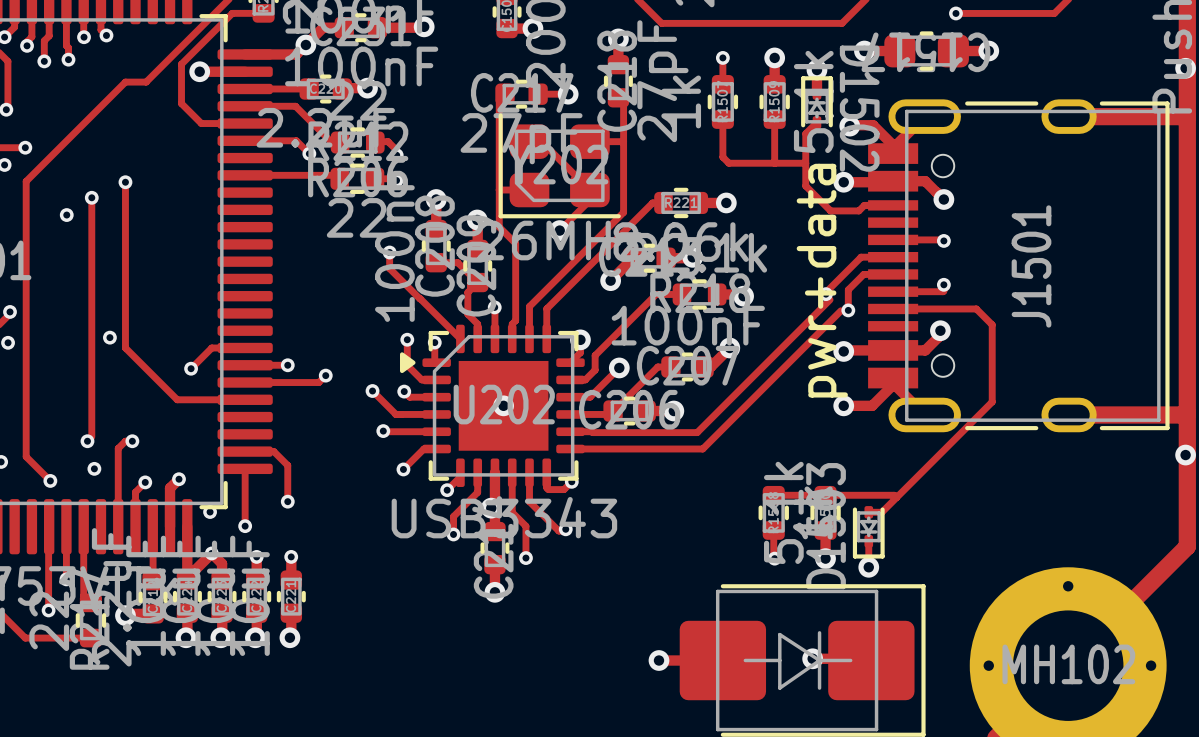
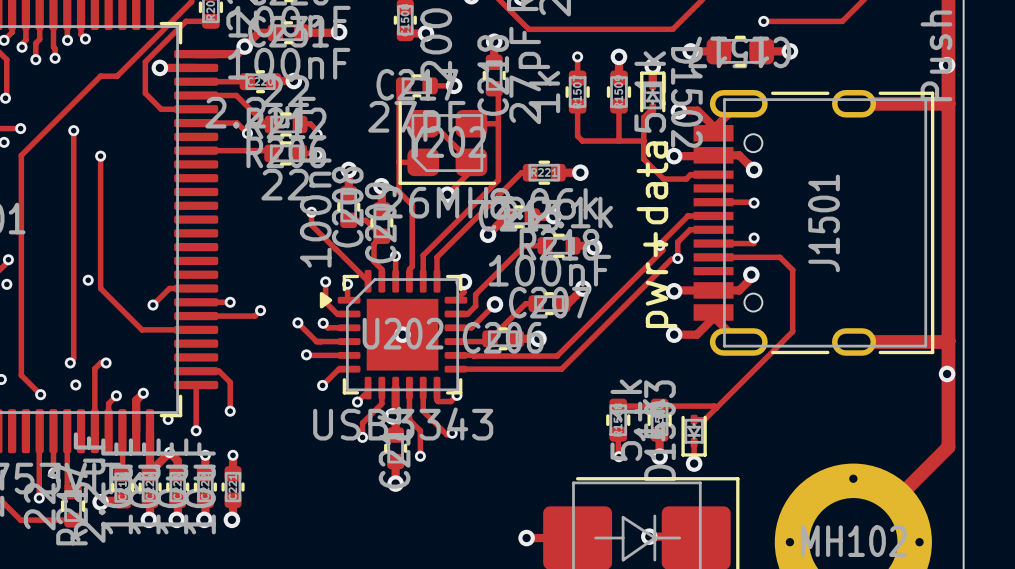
track: none -> (73, 130) (73, 168)
via: none -> (73, 130)
via: (91, 197) -> none
via: (66, 215) -> none

